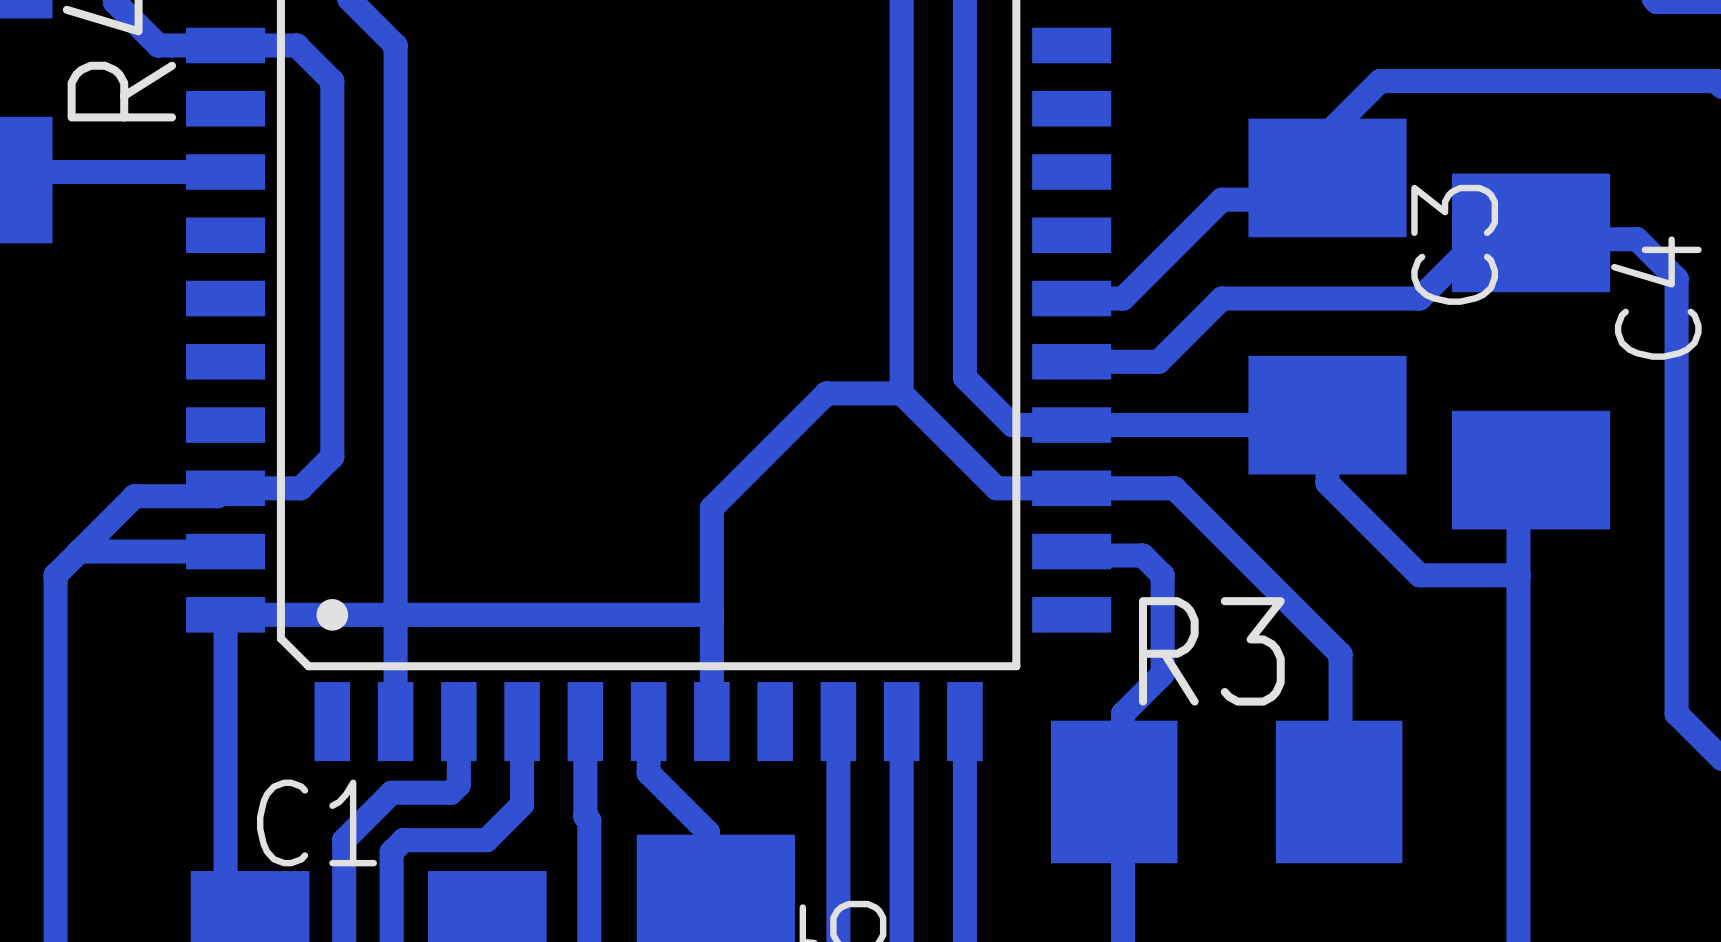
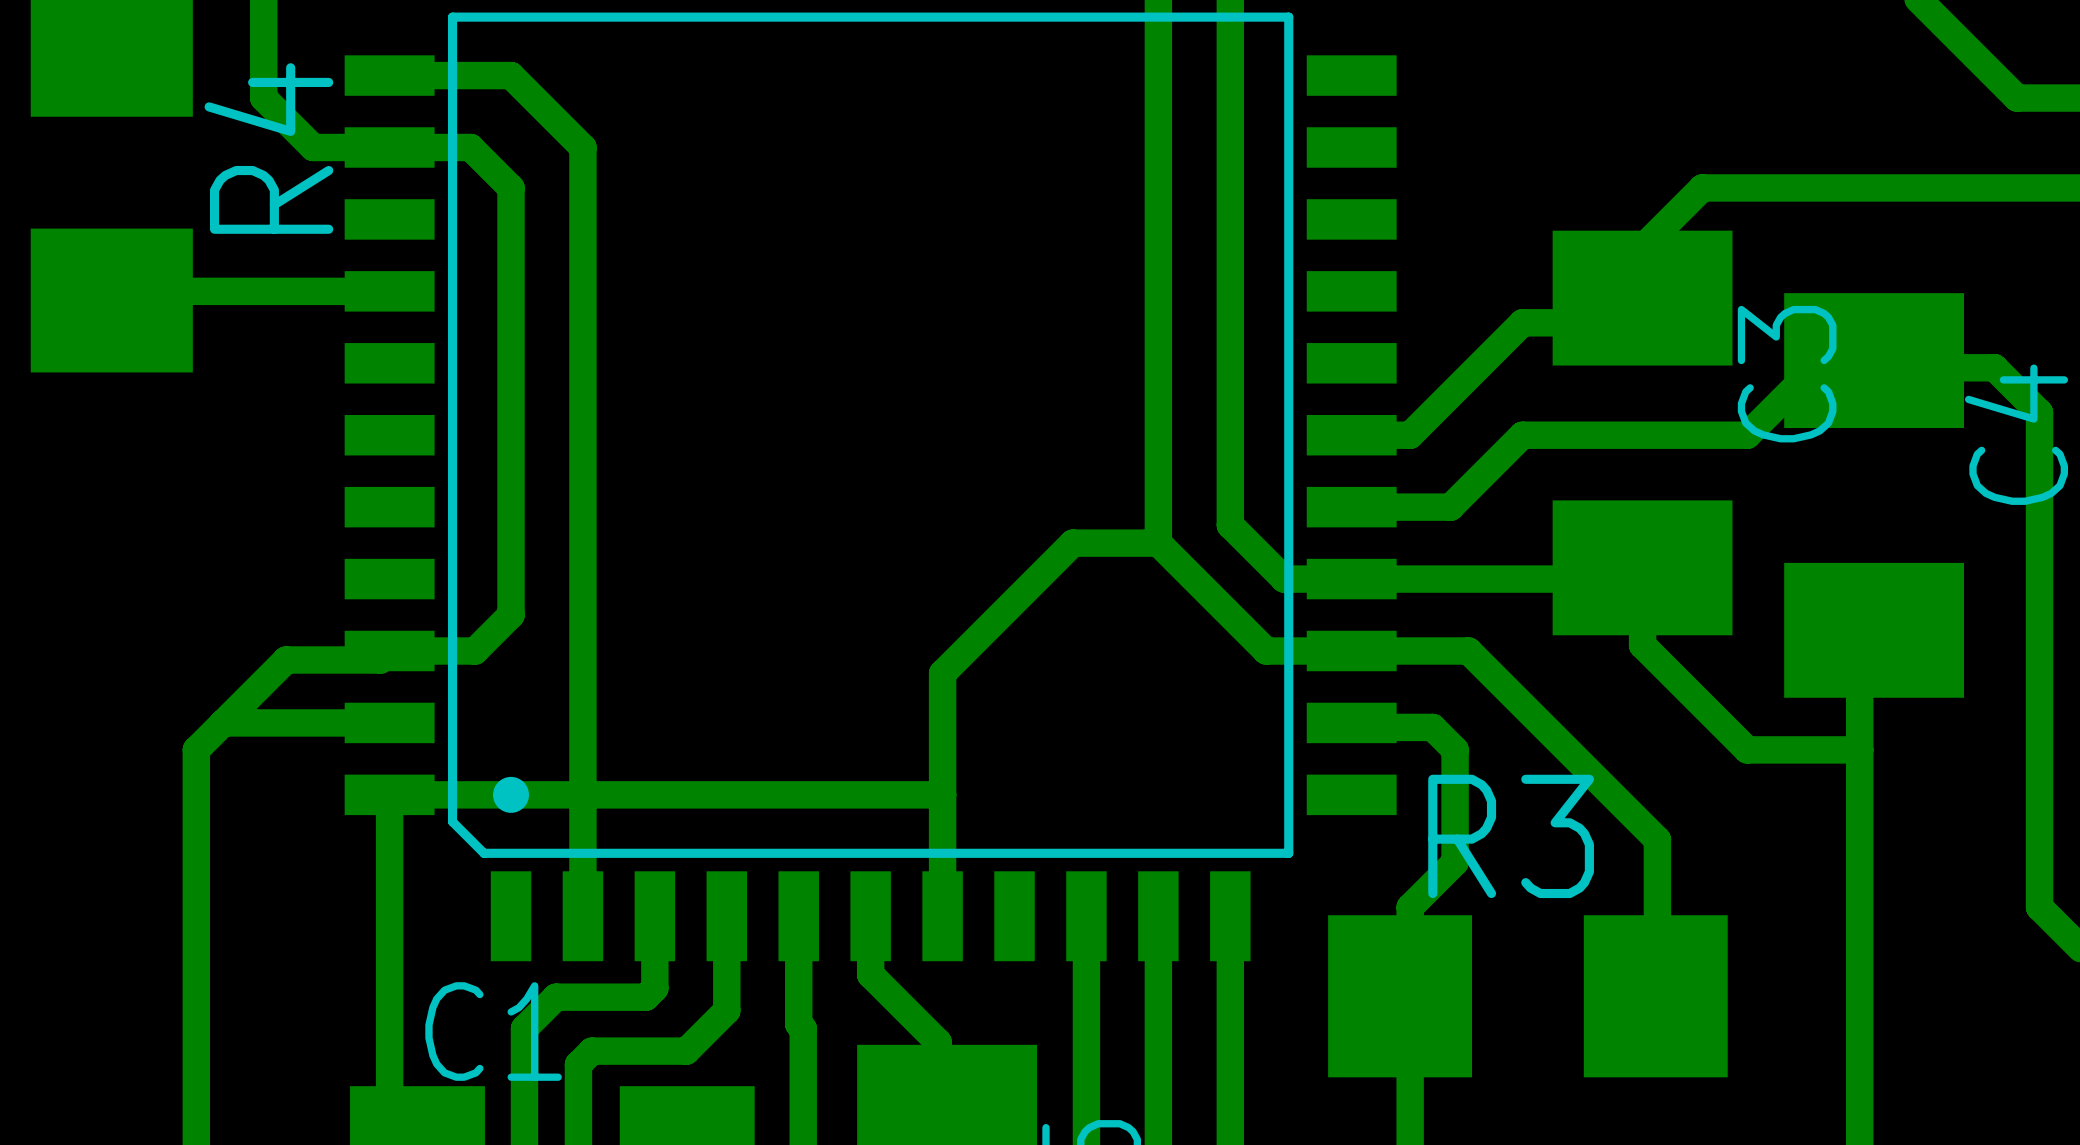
track: (391, 792) (344, 840) -> (578, 997) (555, 997) (524, 1028) (524, 1051)

